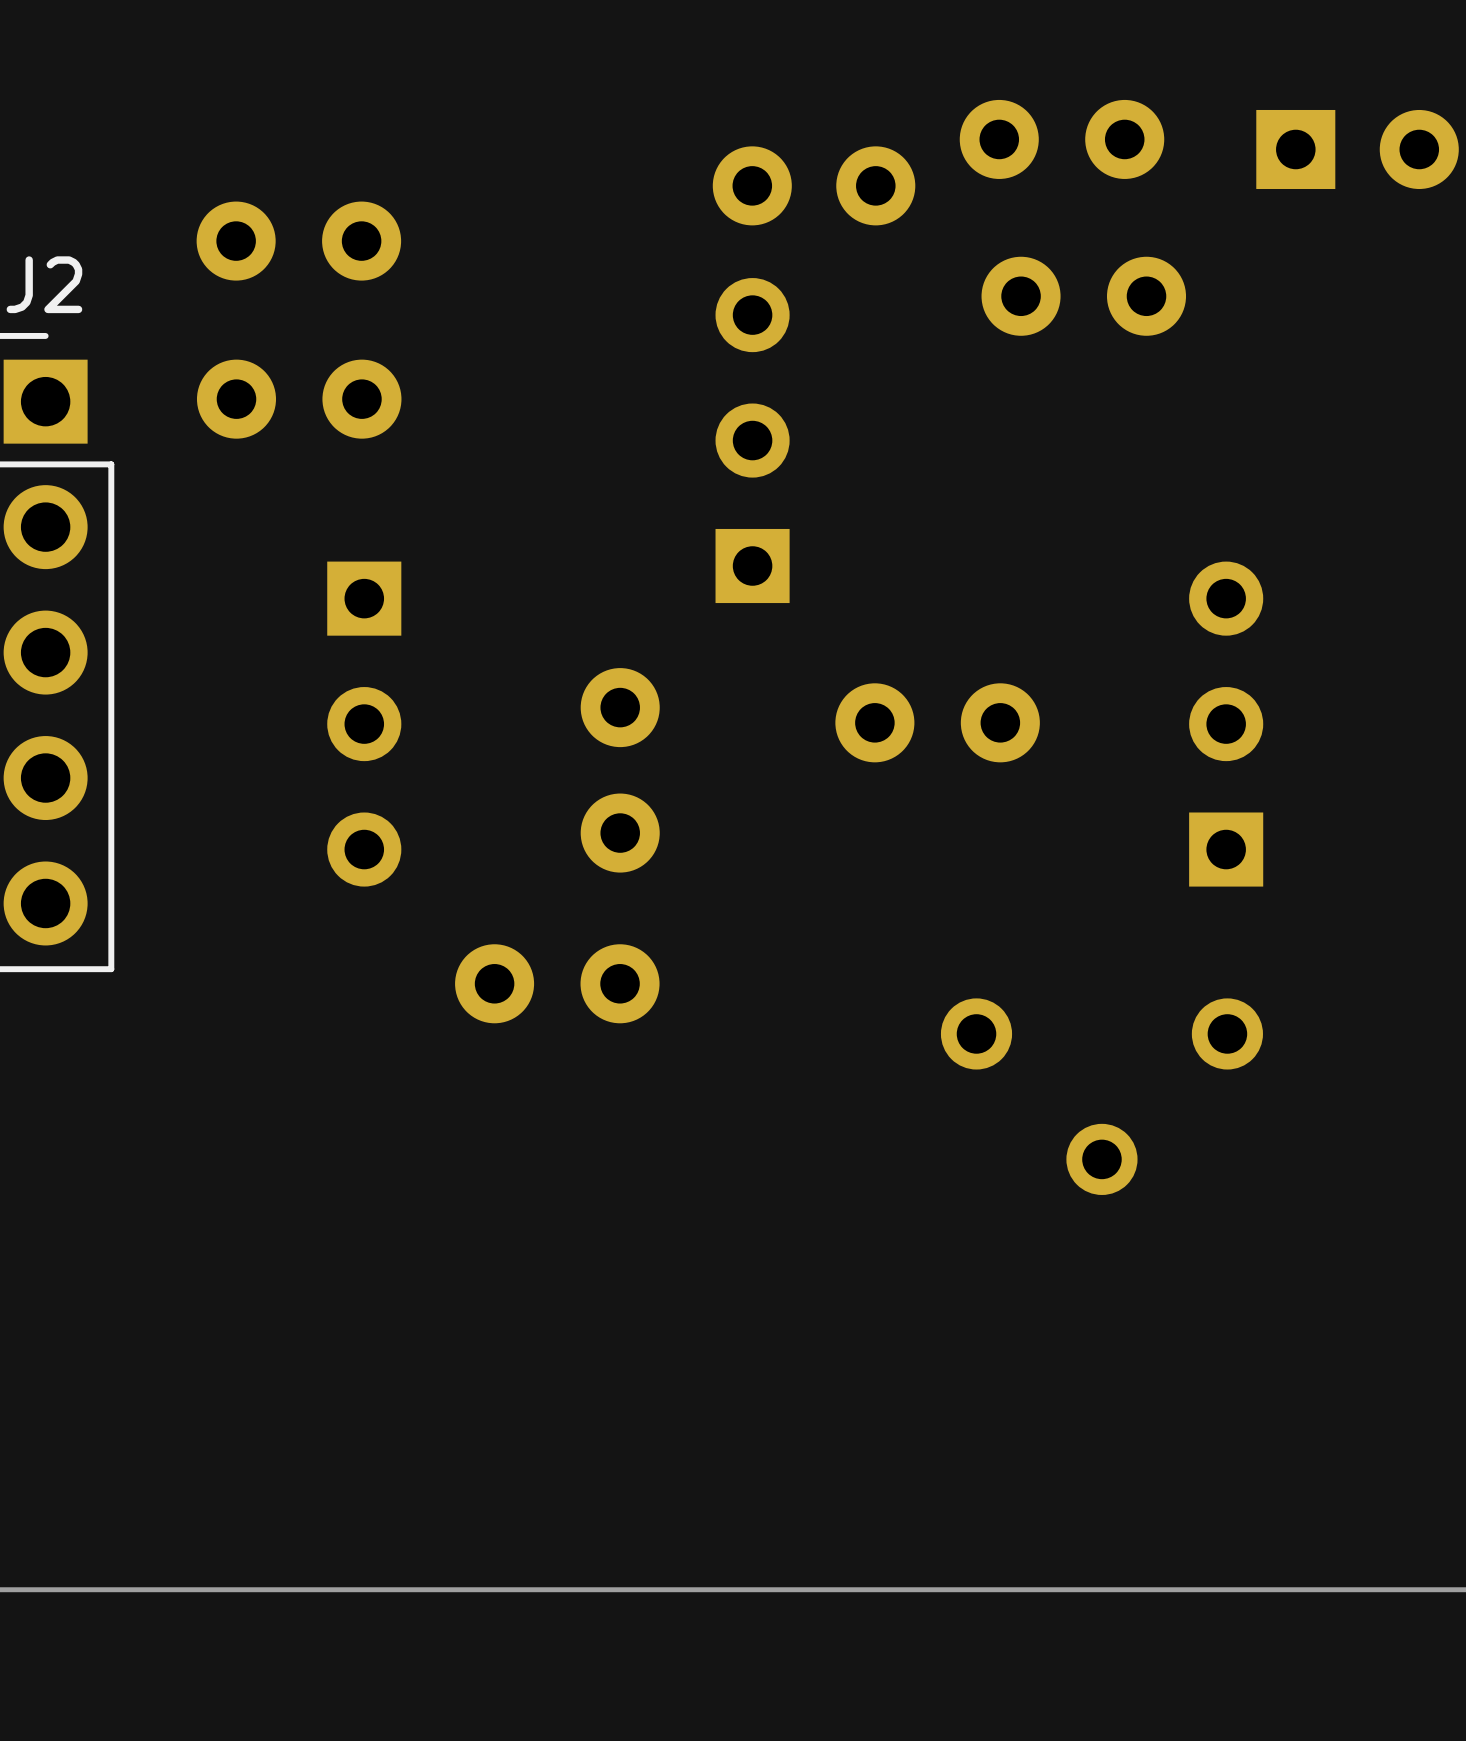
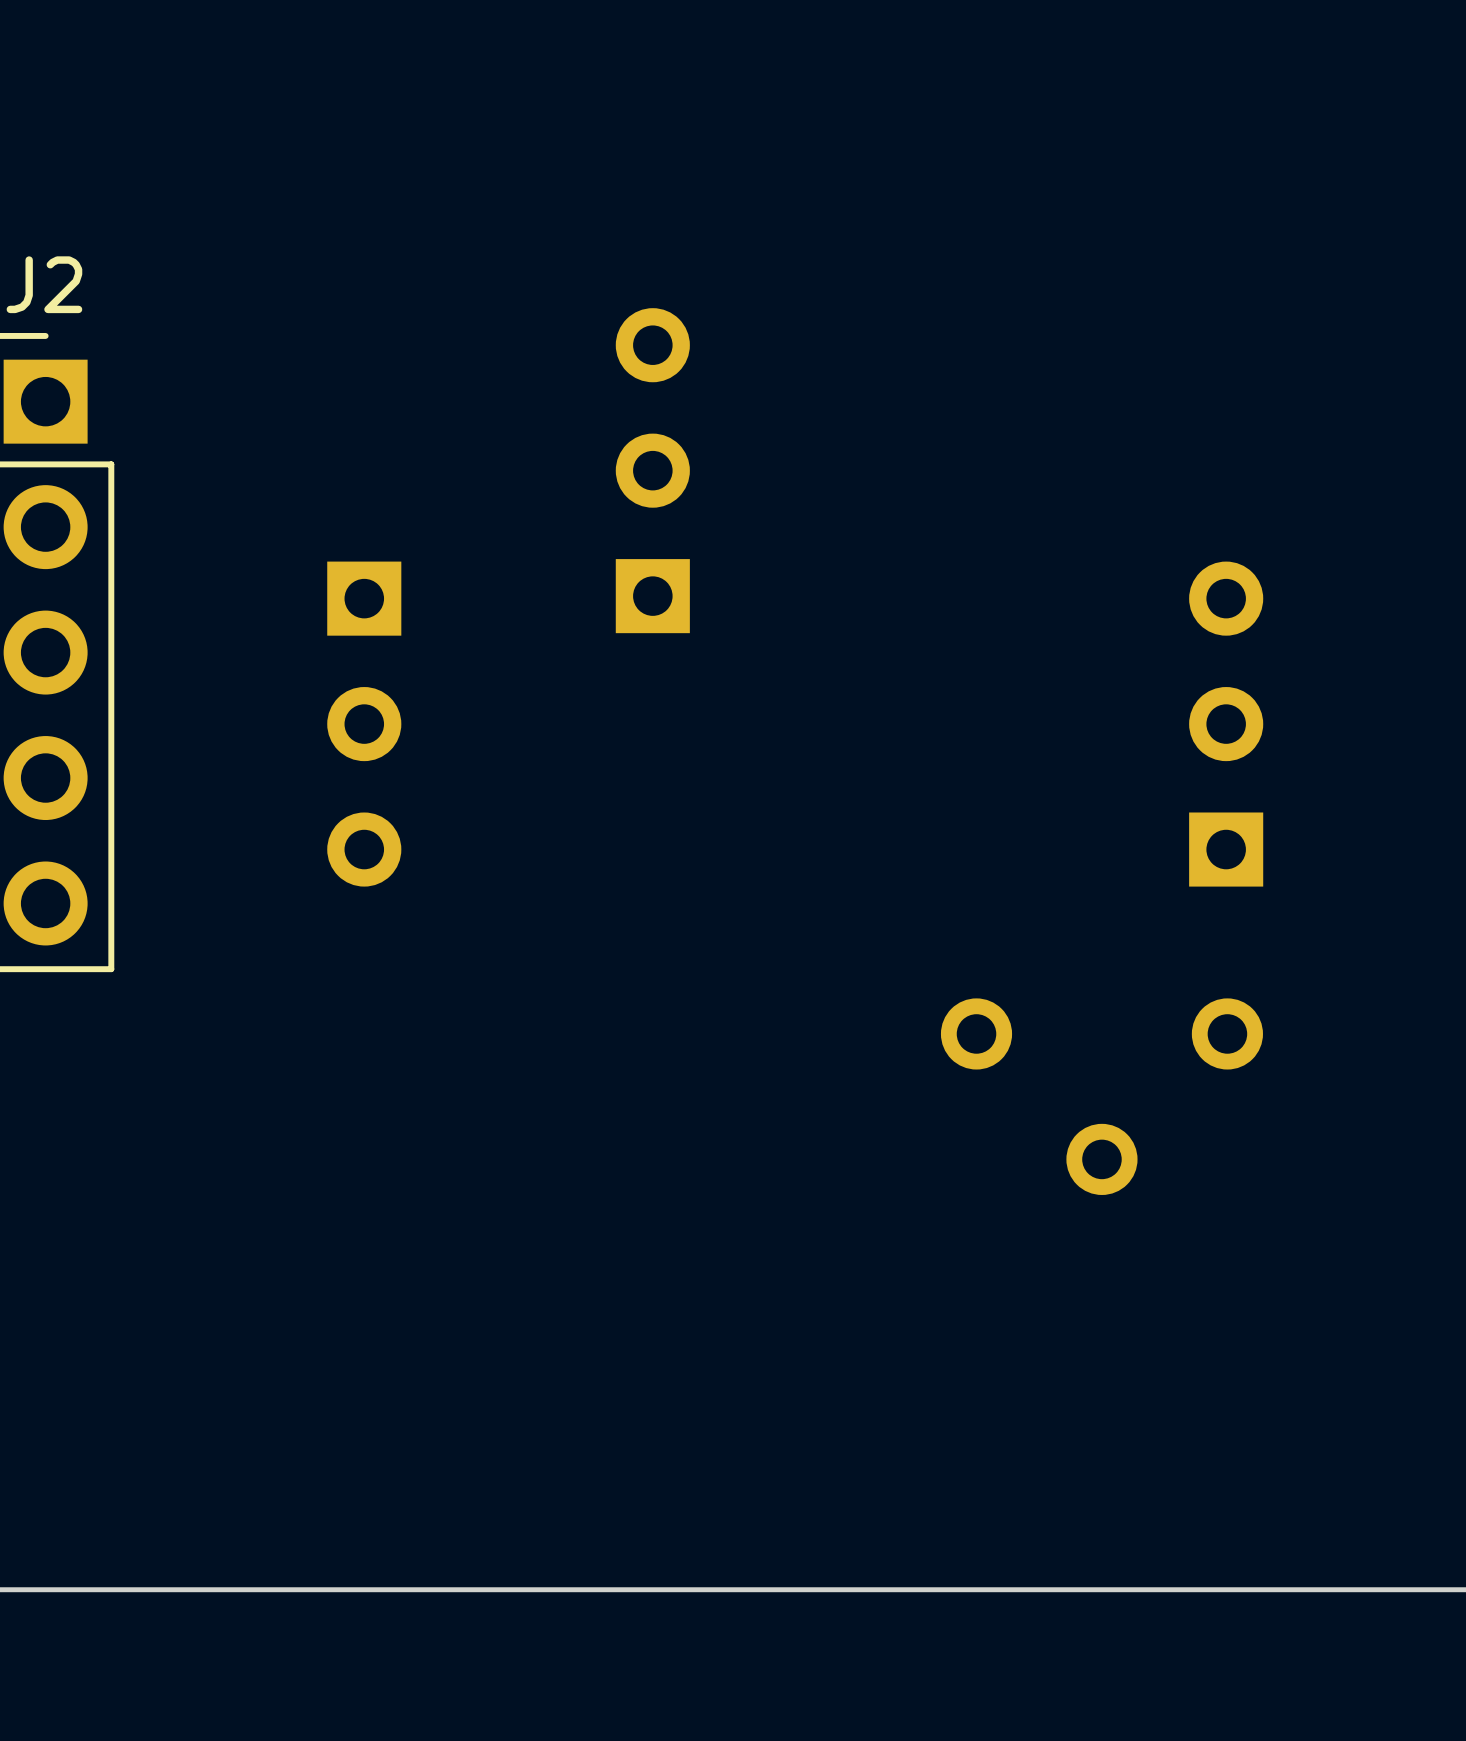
part: (1062, 139) -> none
part: (1357, 149) -> none
part: (814, 185) -> none
part: (298, 241) -> none
part: (1083, 296) -> none
part: (299, 399) -> none
part position: (752, 440) -> (652, 470)
part: (937, 722) -> none
part: (620, 770) -> none
part: (557, 983) -> none

